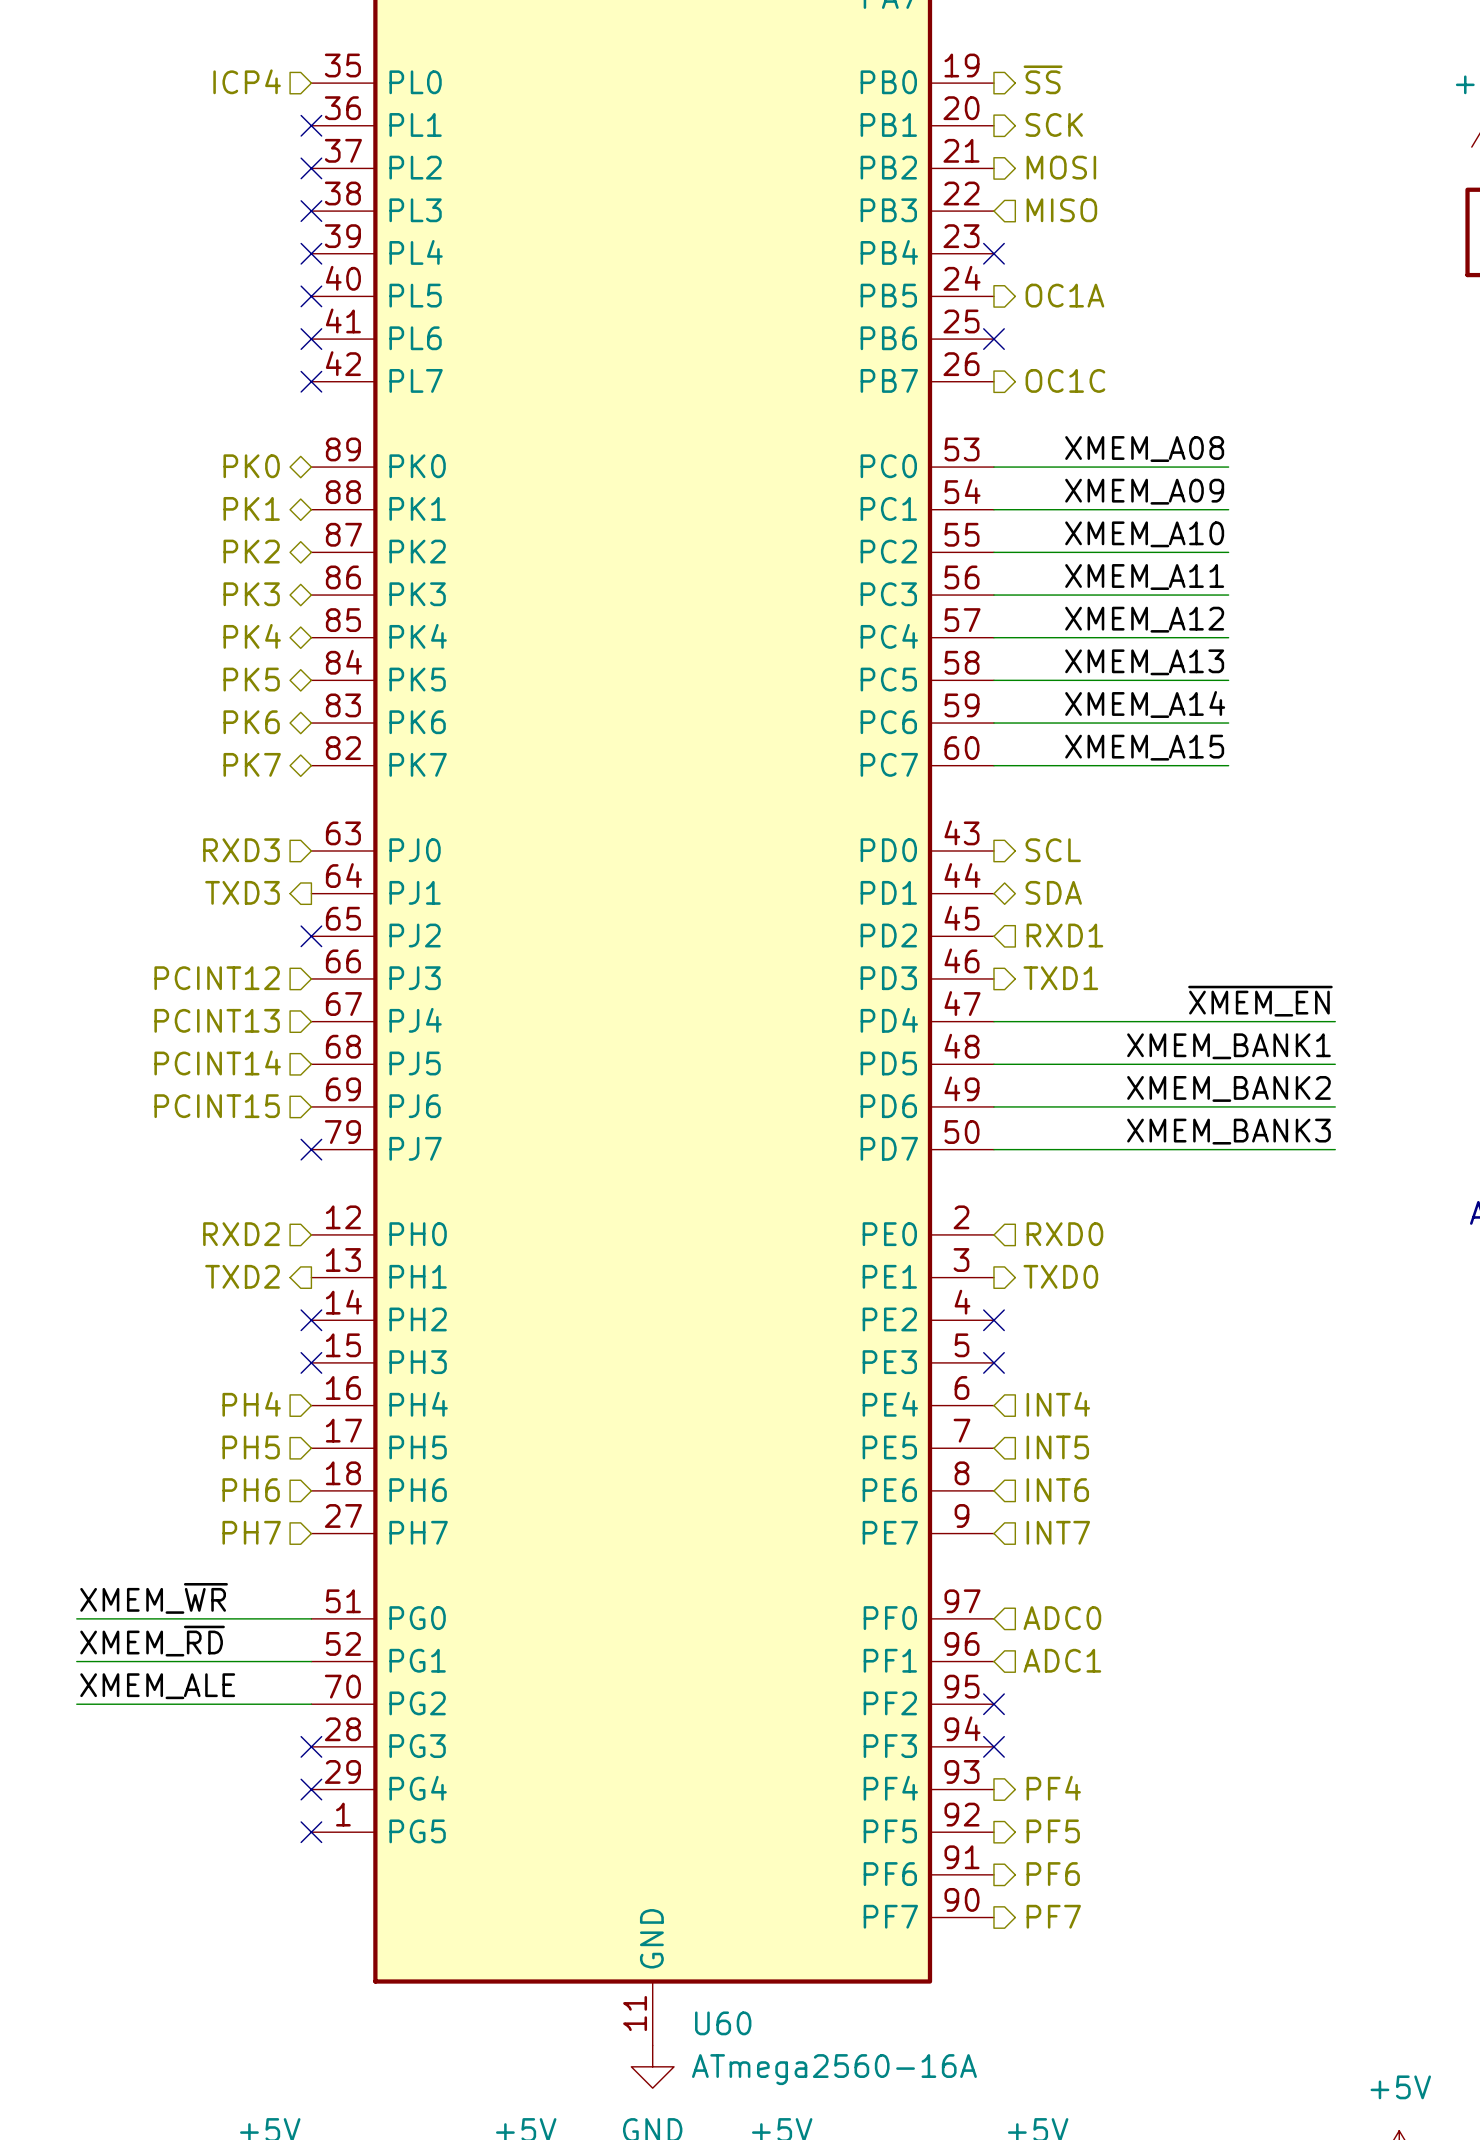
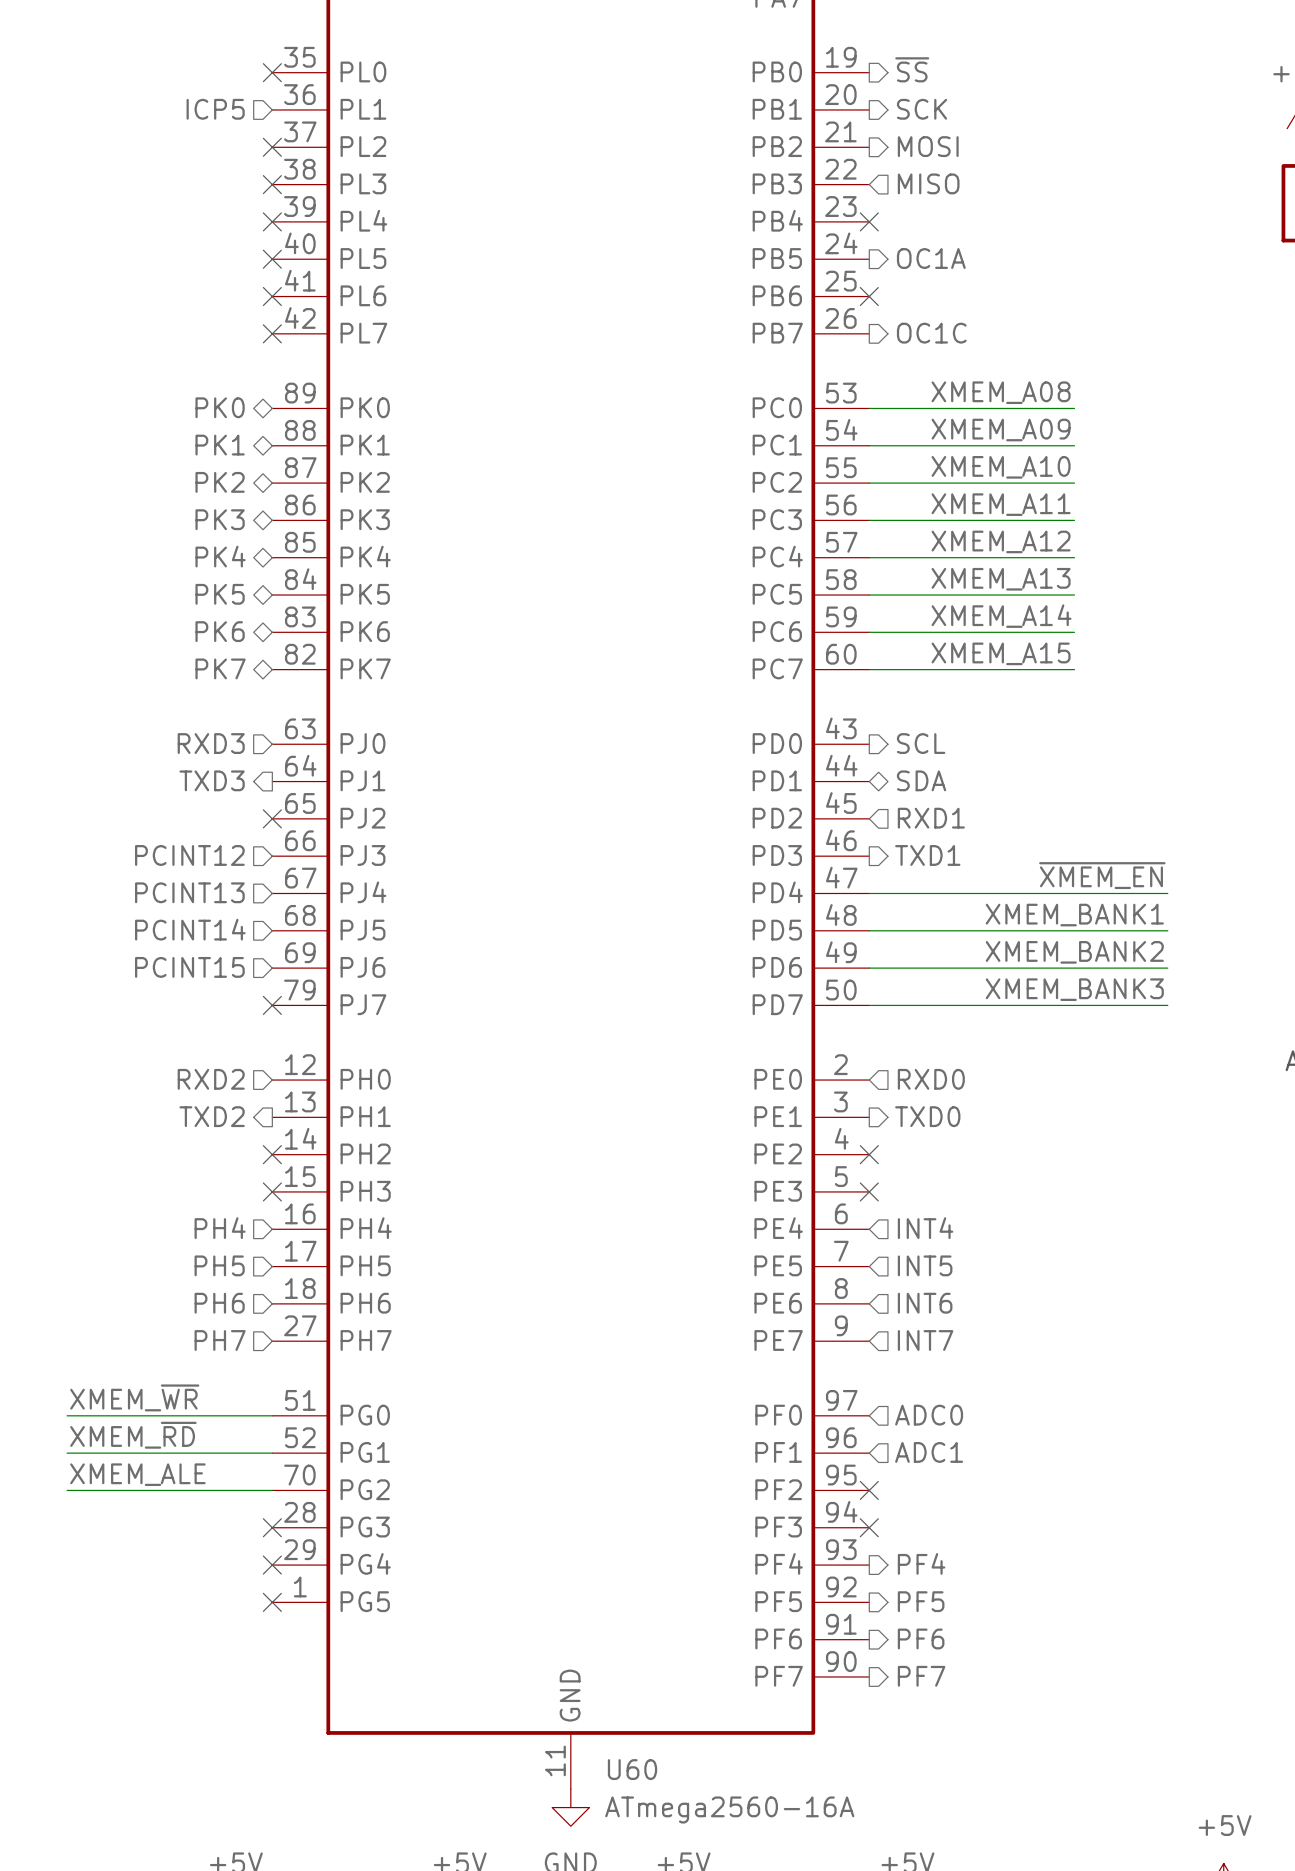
hierarchical label: ICP4 (247, 81) -> ICP5 (215, 109)
no-connect mark position: (311, 125) -> (272, 72)

